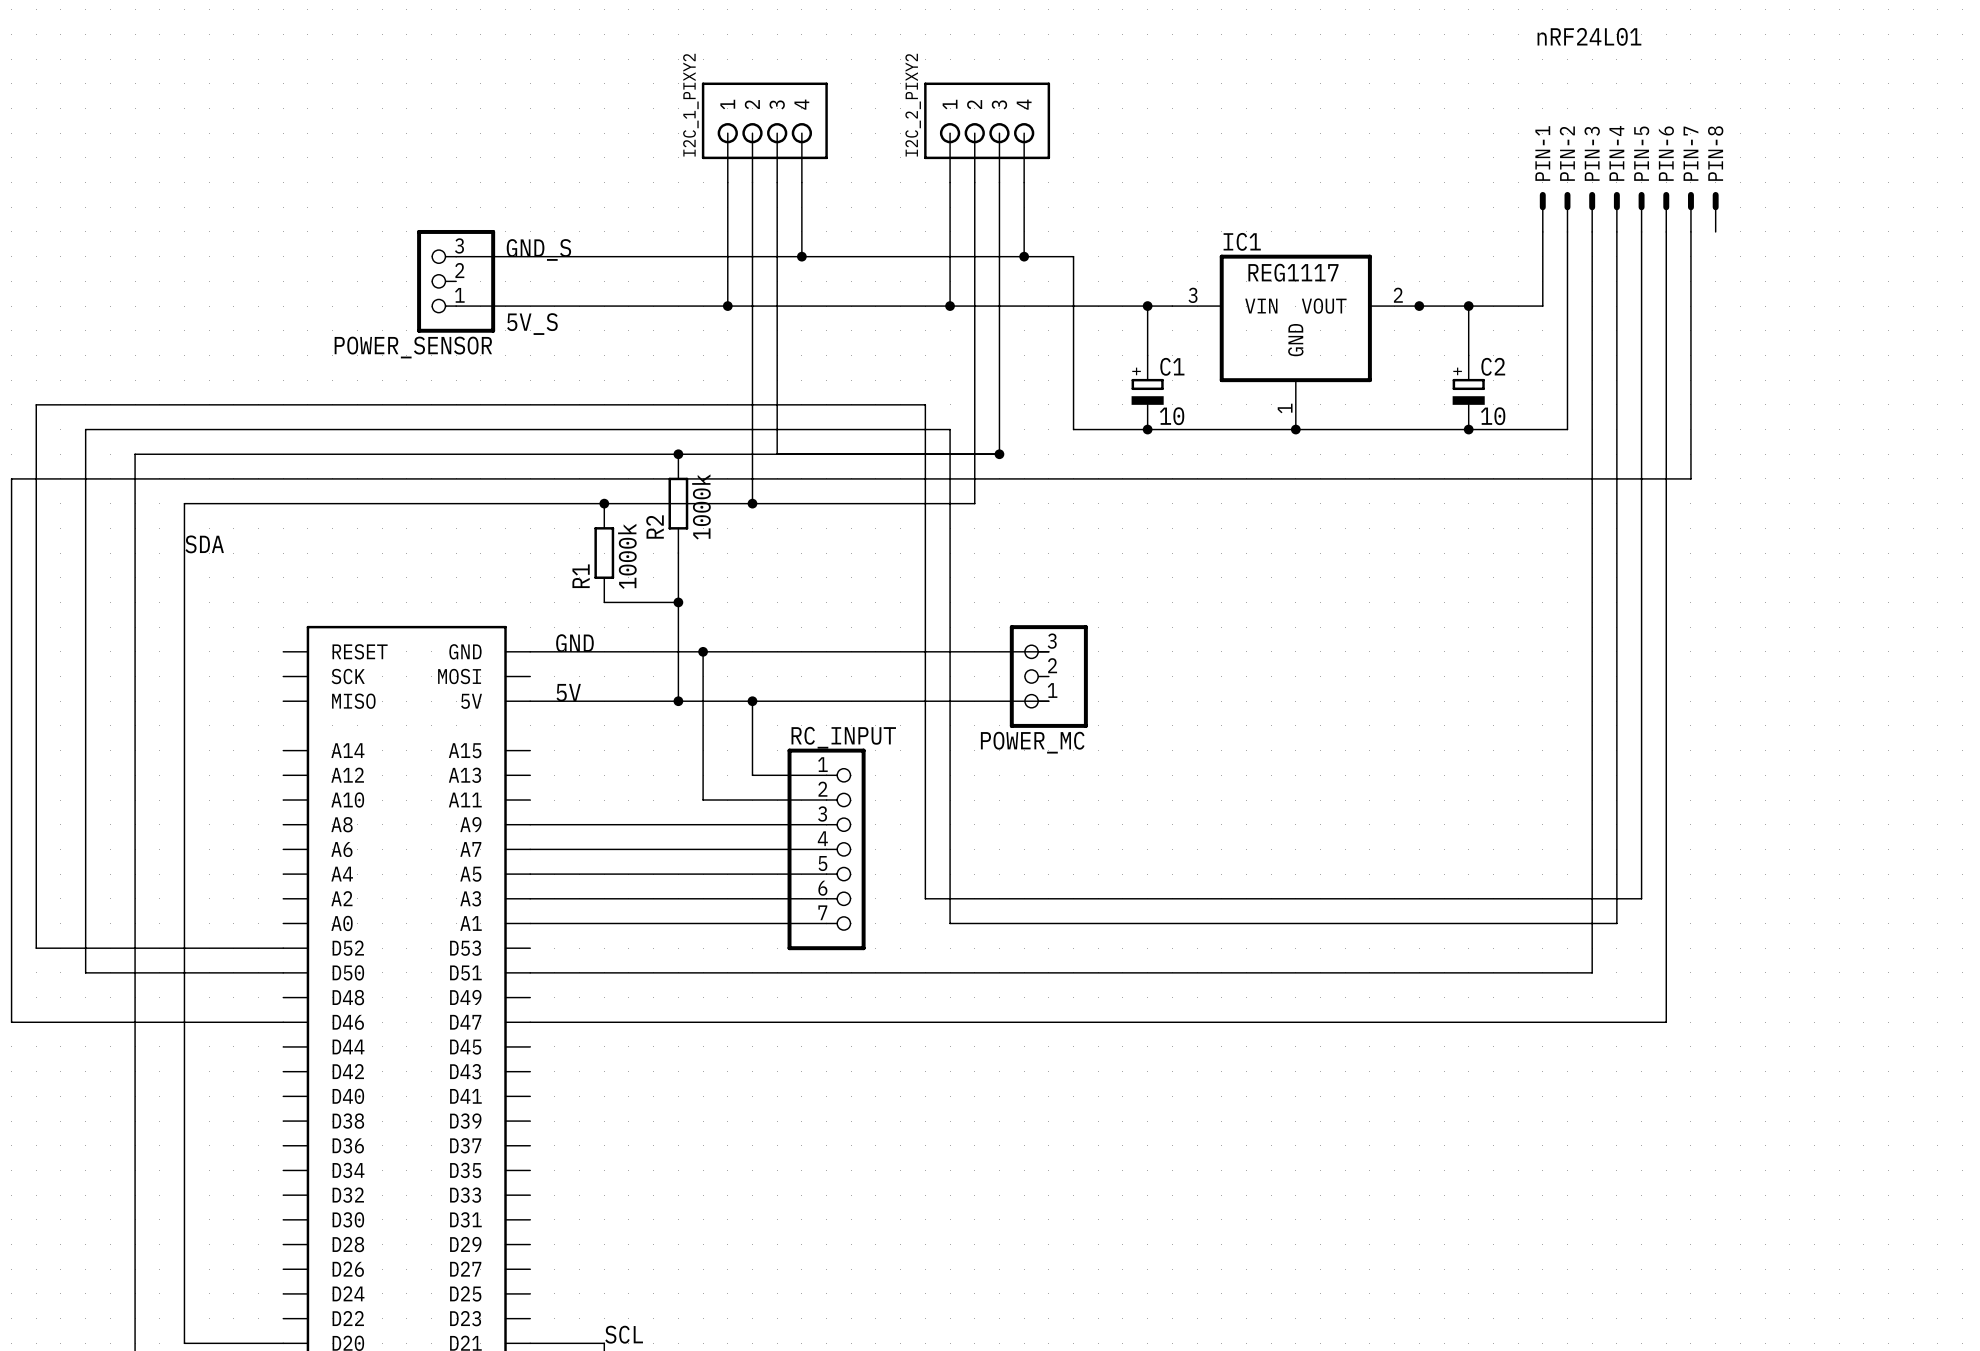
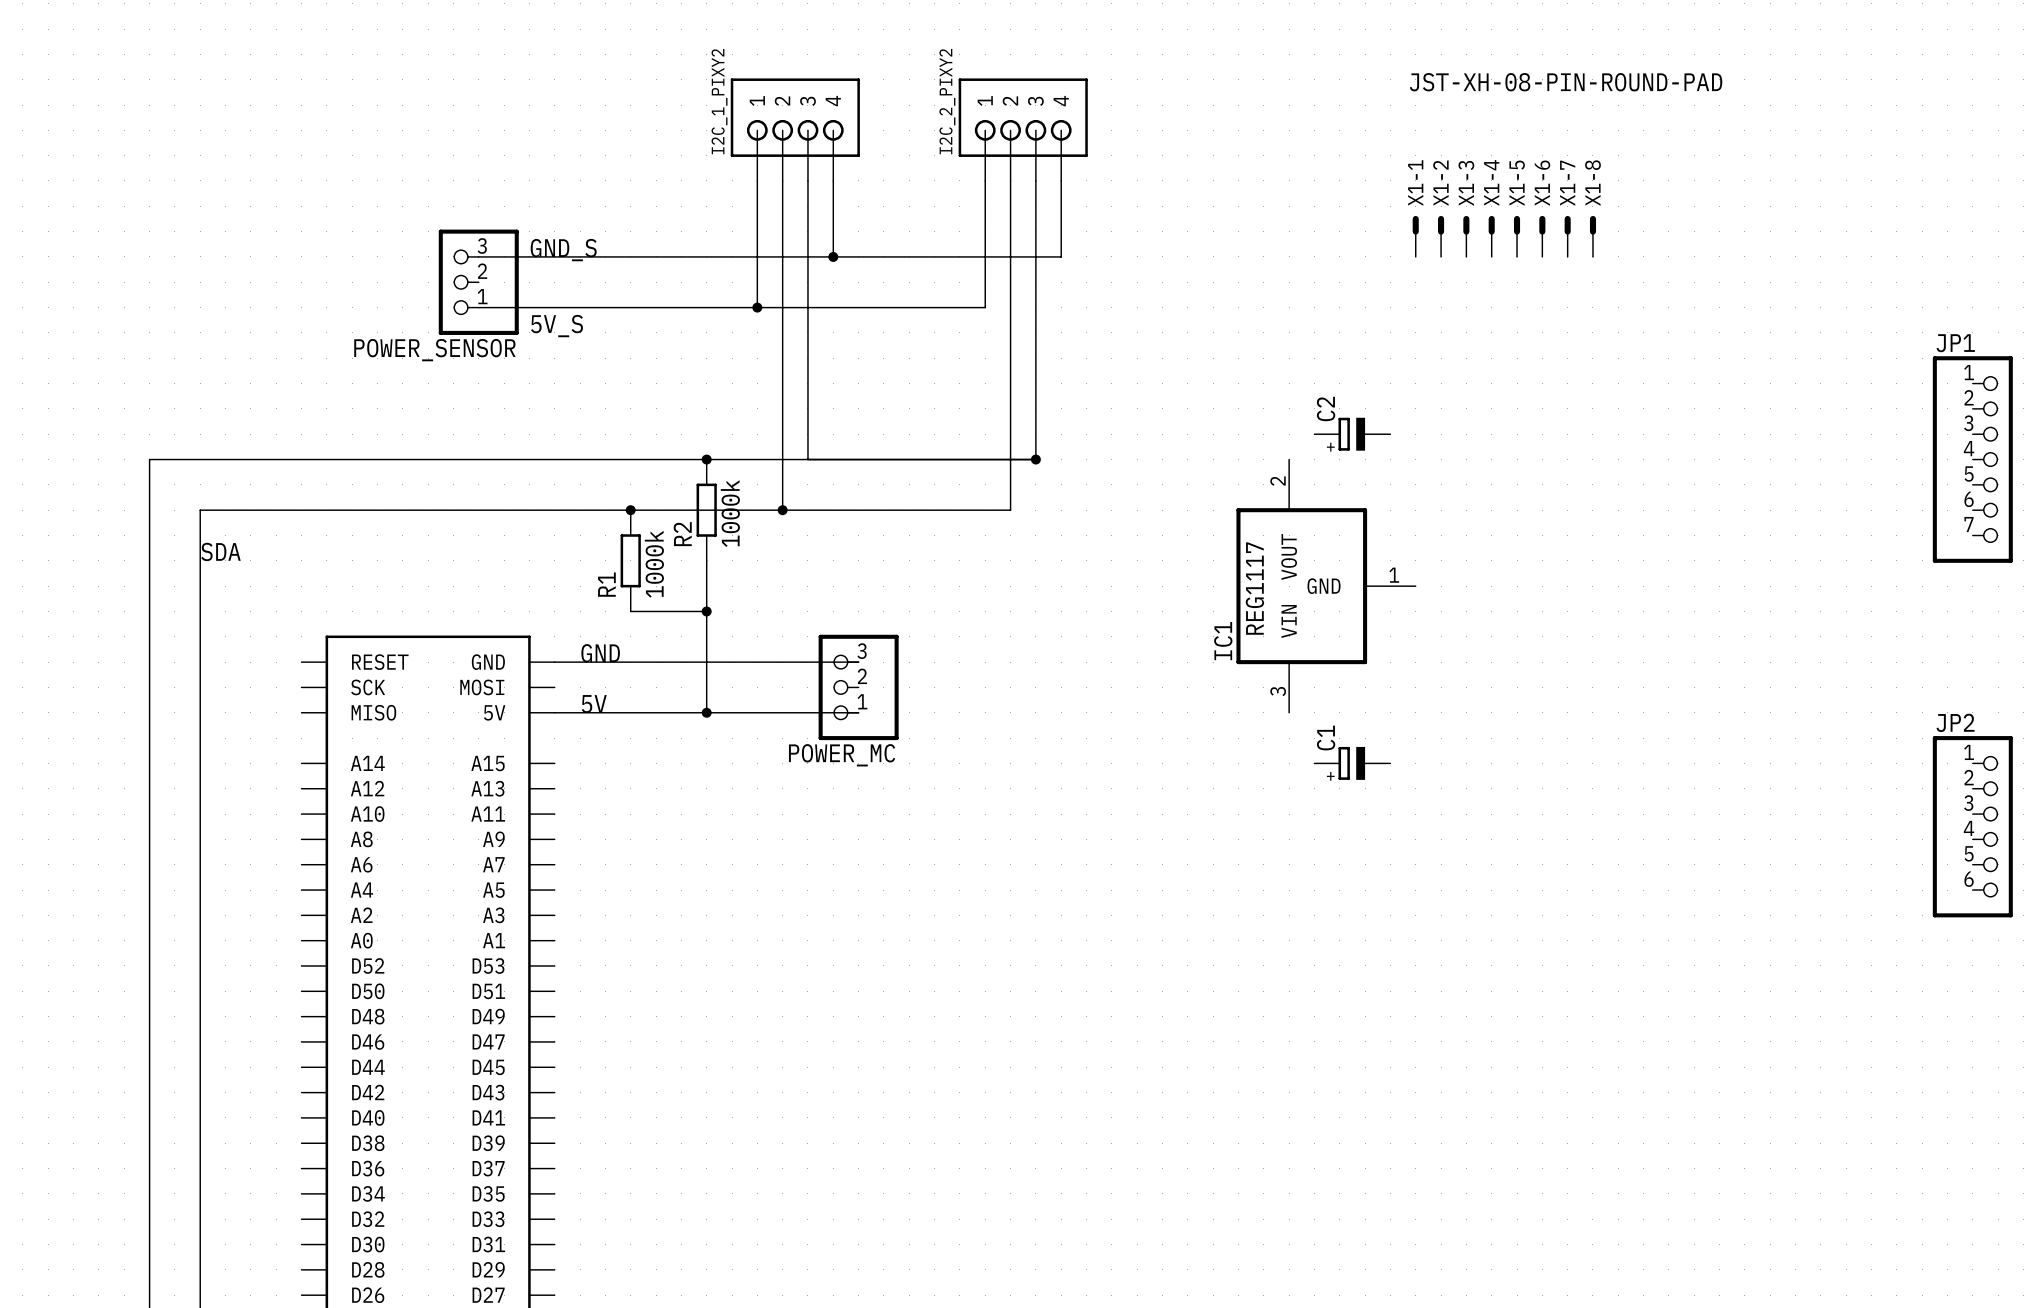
PIN-1: nRF24L01 (1542, 211) -> none
PIN-2: (1567, 211) -> none
PIN-3: (1592, 211) -> none
PIN-4: (1616, 211) -> none
PIN-5: (1641, 211) -> none
PIN-6: (1666, 211) -> none
PIN-7: (1690, 211) -> none
PIN-8: (1715, 211) -> none
wire: (1542, 231) (1542, 306) (1419, 306) -> none
wire: (1567, 231) (1567, 429) (1073, 429) (1073, 256) (1024, 256) -> none
wire: (1592, 231) (1592, 972) (530, 972) -> none
wire: (1616, 231) (1616, 923) (950, 923) (950, 429) (85, 429) (85, 972) (283, 972) -> none
wire: (1641, 231) (1641, 898) (925, 898) (925, 404) (36, 404) (36, 948) (283, 948) -> none
wire: (1666, 231) (1666, 1022) (530, 1022) -> none
wire: (1690, 231) (1690, 478) (11, 478) (11, 1022) (283, 1022) -> none
X1-1: none -> JST-XH-08-PIN-ROUND-PAD (1415, 236)
X1-2: none -> (1441, 236)
X1-3: none -> (1466, 236)
X1-4: none -> (1491, 236)
X1-5: none -> (1517, 236)
X1-6: none -> (1542, 236)
X1-7: none -> (1567, 236)
X1-8: none -> (1592, 236)
junction: (1024, 256) -> none
wire: (950, 306) (1172, 306) -> none
junction: (950, 306) -> none
wire: (1147, 306) (1147, 355) -> none
junction: (1147, 306) -> none
junction: (1419, 306) -> none
wire: (1468, 306) (1468, 355) -> none
junction: (1468, 306) -> none
IC1 rotation: 0° (1295, 318) -> 90° counterclockwise (1301, 586)
IC1 position: (1295, 342) -> (1326, 586)
C1 symbol: [1131, 355, 1164, 430] -> [1314, 746, 1391, 780]
C2 symbol: [1452, 355, 1485, 430] -> [1314, 417, 1391, 451]
C1 name position: C1 (1172, 366) -> C1 (1326, 738)
C2 name position: C2 (1493, 366) -> C2 (1326, 409)
C1 value: 10 (1172, 416) -> none
C2 value: 10 (1493, 416) -> none
junction: (1147, 429) -> none
junction: (1295, 429) -> none
junction: (1468, 429) -> none
JP1: none -> (1972, 459)
wire: (703, 651) (703, 800) (826, 800) -> none
junction: (703, 651) -> none
wire: (826, 651) (1048, 651) -> none
POWER_MC position: (1048, 676) -> (858, 687)
wire: (752, 701) (752, 775) (826, 775) -> none
junction: (752, 701) -> none
wire: (826, 701) (1048, 701) -> none
JP2: none -> (1972, 826)
wire: (530, 824) (826, 824) -> none
wire: (530, 849) (826, 849) -> none
RC_INPUT: (826, 849) -> none
wire: (530, 874) (826, 874) -> none
wire: (530, 898) (826, 898) -> none
wire: (530, 923) (826, 923) -> none

